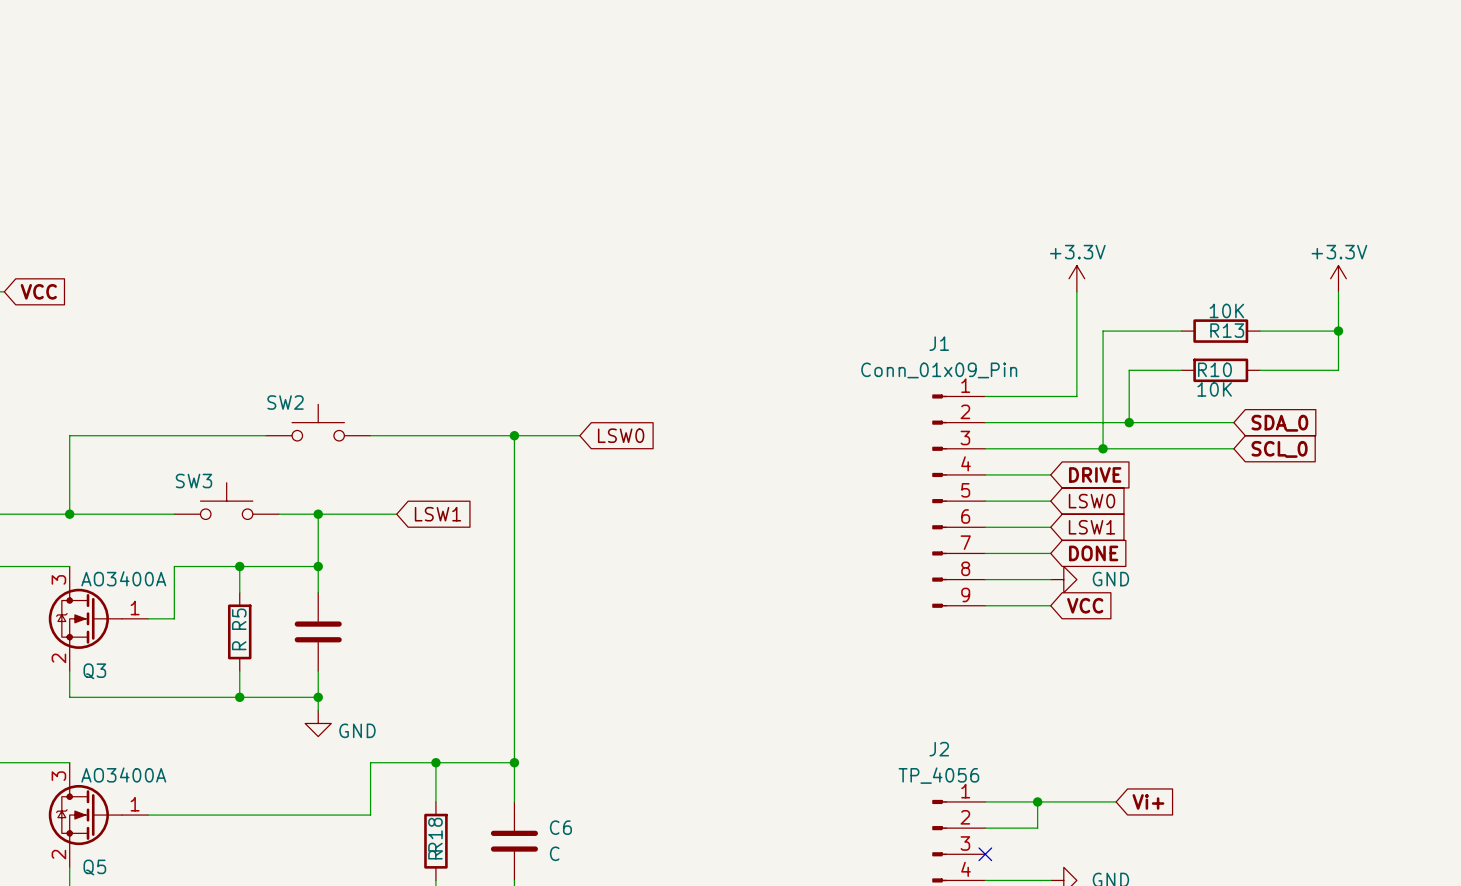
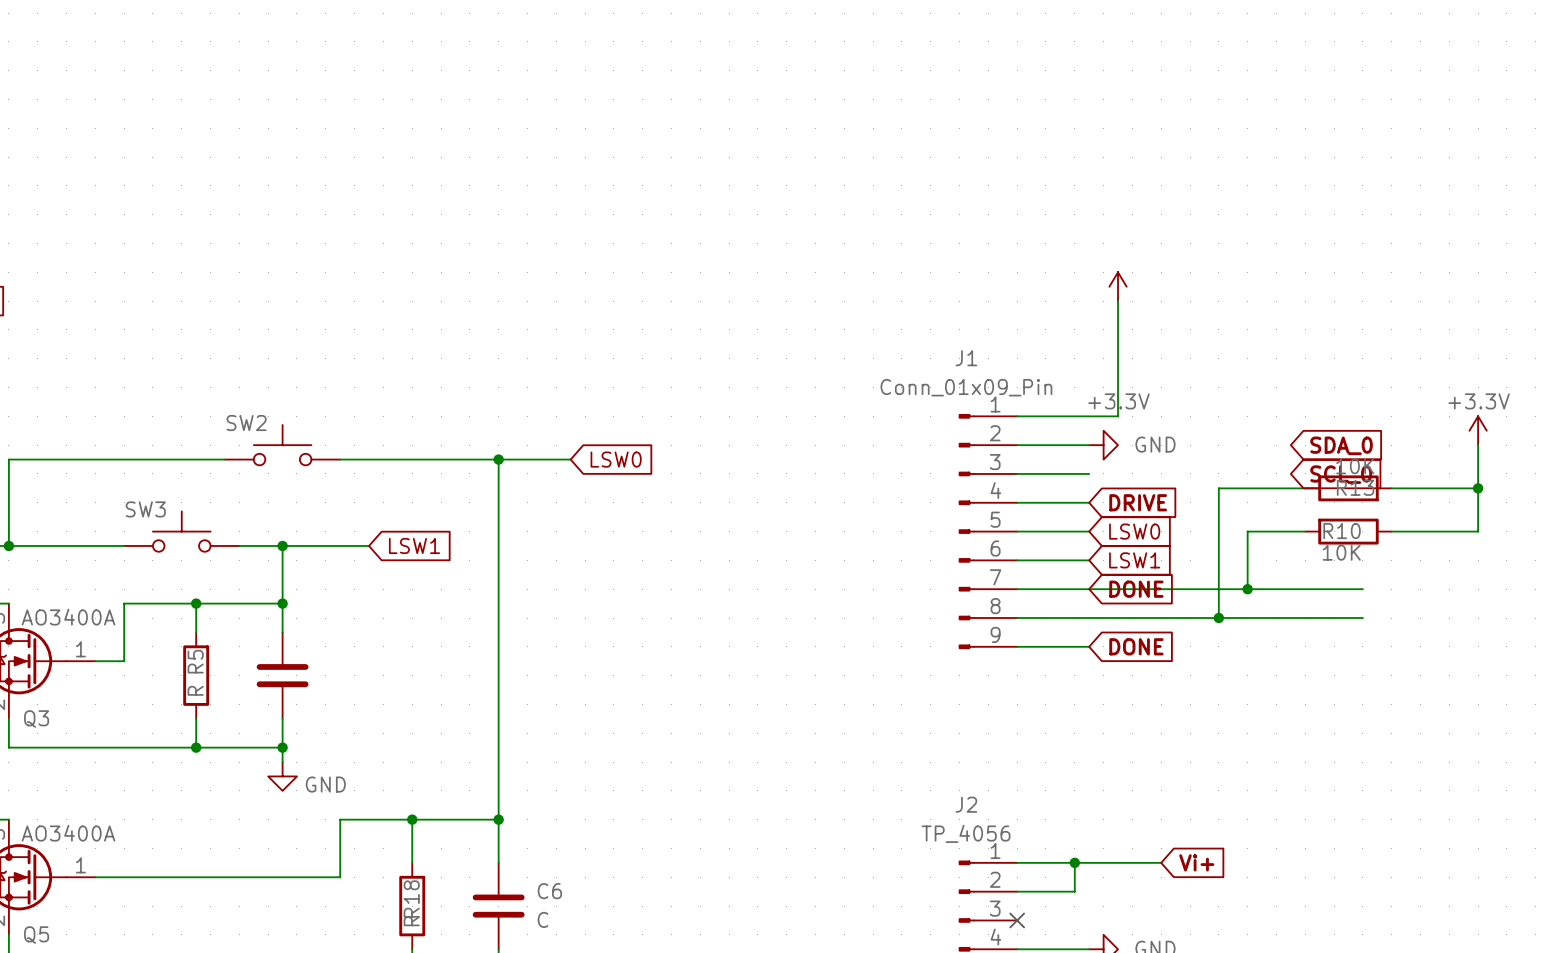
power symbol text position: +3.3V (1077, 252) -> +3.3V (1119, 401)
power symbol position: +3.3V (1338, 278) -> +3.3V (1478, 430)
wire: (1338, 291) (1338, 370) (1260, 370) -> (1478, 445) (1478, 531) (1391, 531)
wire: (1181, 331) (1103, 331) (1103, 448) -> (1305, 488) (1218, 488) (1218, 618)
R13 position: (1220, 331) -> (1348, 488)
wire: (1260, 331) (1338, 331) -> (1391, 488) (1478, 488)
junction: (1338, 331) -> none
wire: (1181, 370) (1129, 370) (1129, 422) -> (1305, 531) (1247, 531) (1247, 589)
R10 position: (1220, 370) -> (1348, 531)
wire: (1050, 422) (1233, 422) -> none
junction: (1129, 422) -> none
wire: (1050, 448) (1233, 448) -> none
junction: (1103, 448) -> none
junction: none -> (1478, 488)
wire: none -> (1089, 589) (1362, 589)
junction: none -> (1247, 589)
wire: none -> (1089, 618) (1362, 618)
power symbol position: GND (1063, 579) -> GND (1103, 445)
junction: none -> (1218, 618)
global label: VCC (1085, 605) -> DONE (1136, 646)

